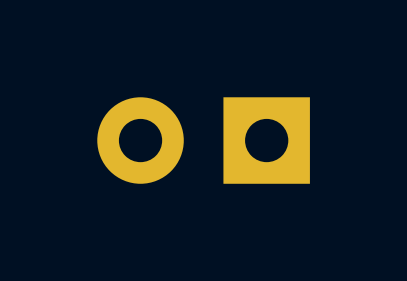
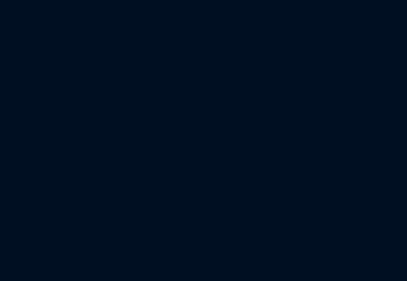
part: (203, 140) -> none

